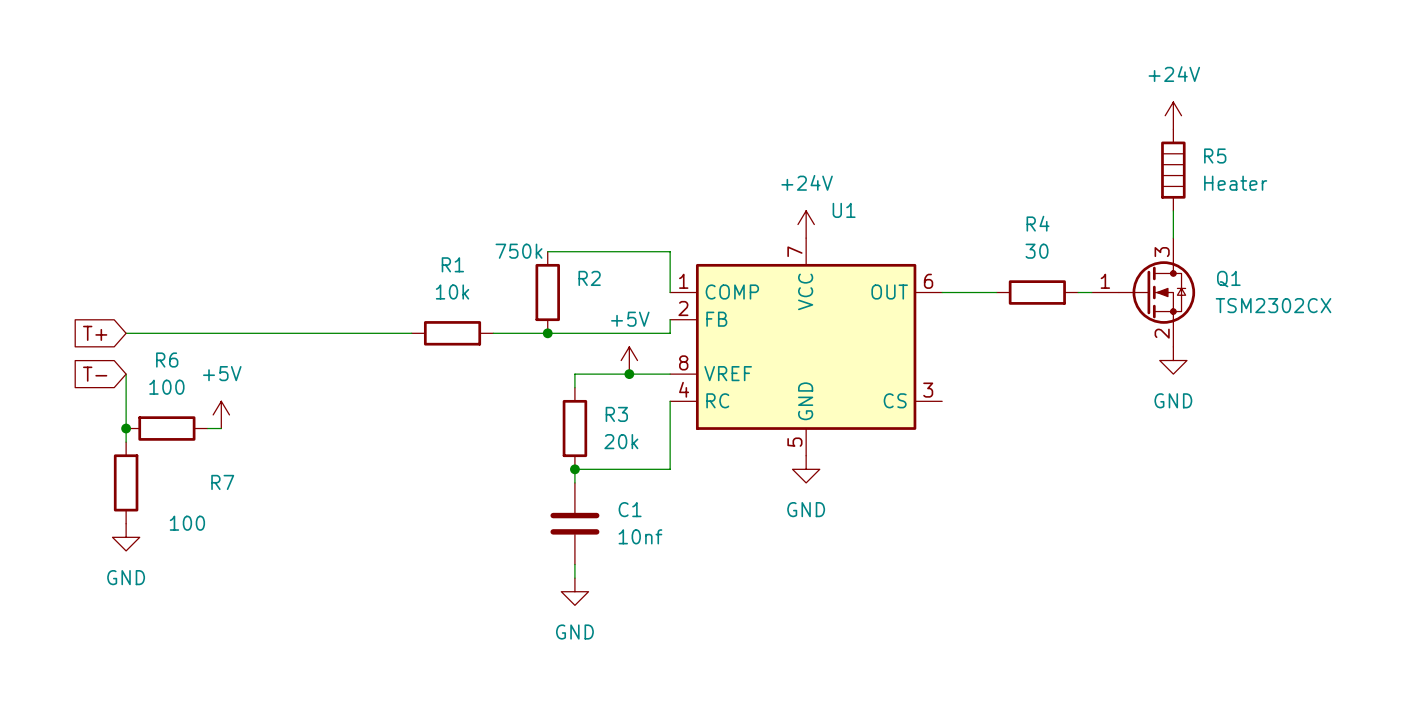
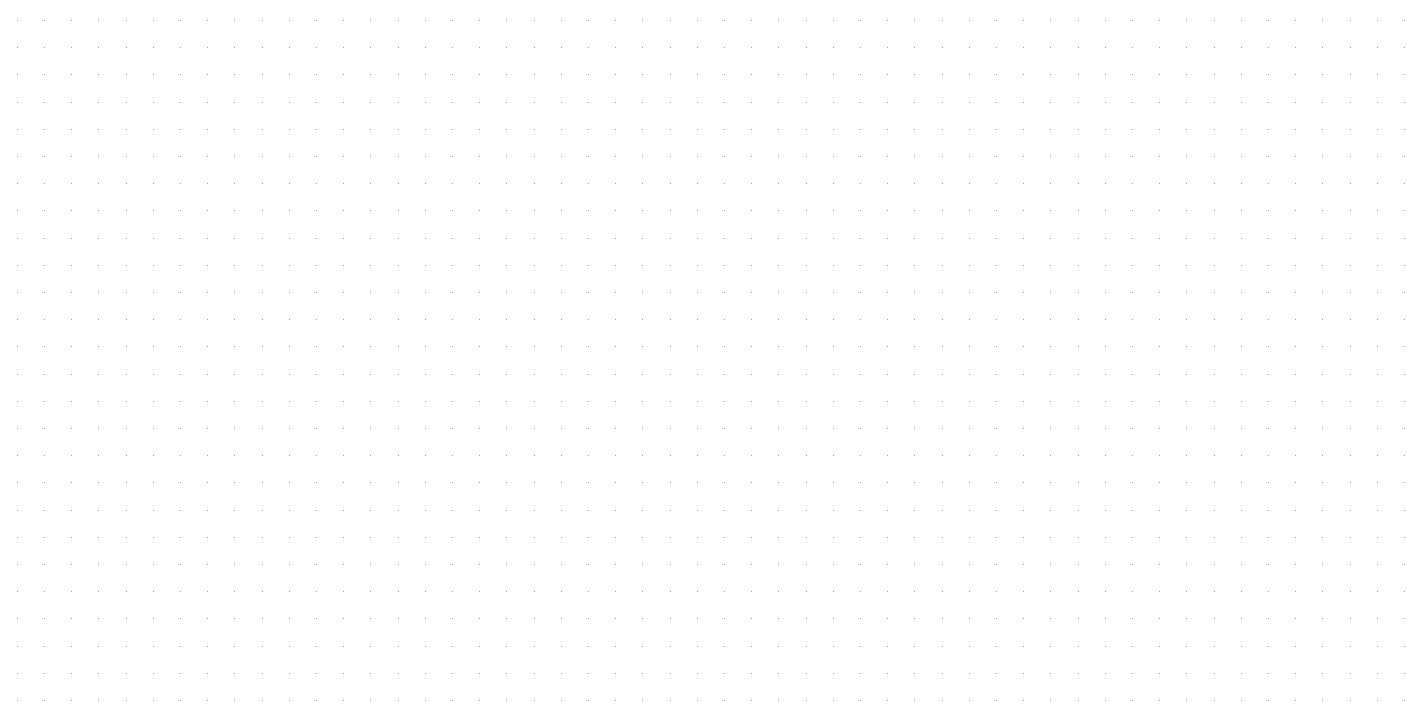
power symbol: +24V (1173, 115) -> none
R5: Heater (1173, 170) -> none
wire: (1173, 210) (1173, 238) -> none
power symbol: +24V (806, 224) -> none
wire: (547, 251) (670, 251) (670, 292) -> none
R2: 750k (547, 292) -> none
wire: (942, 292) (996, 292) -> none
R4: 30 (1037, 292) -> none
wire: (1078, 292) (1091, 292) -> none
Q1: TSM2302CX (1143, 292) -> none
wire: (670, 319) (670, 333) (493, 333) -> none
global label: T+ (95, 333) -> none
wire: (126, 333) (411, 333) -> none
R1: 10k (452, 333) -> none
junction: (547, 333) -> none
U1: (806, 346) -> none
power symbol: +5V (629, 360) -> none
power symbol: GND (1173, 360) -> none
global label: T- (95, 374) -> none
wire: (126, 374) (126, 442) -> none
junction: (629, 374) -> none
wire: (670, 374) (574, 374) (574, 387) -> none
wire: (670, 401) (670, 469) (574, 469) (574, 482) -> none
power symbol: +5V (221, 414) -> none
junction: (126, 428) -> none
R6: 100 (166, 428) -> none
wire: (207, 428) (221, 428) -> none
R3: 20k (574, 428) -> none
junction: (574, 469) -> none
power symbol: GND (806, 469) -> none
R7: 100 (126, 482) -> none
C1: 10nf (574, 523) -> none
power symbol: GND (126, 537) -> none
wire: (574, 564) (574, 578) -> none
power symbol: GND (574, 591) -> none

